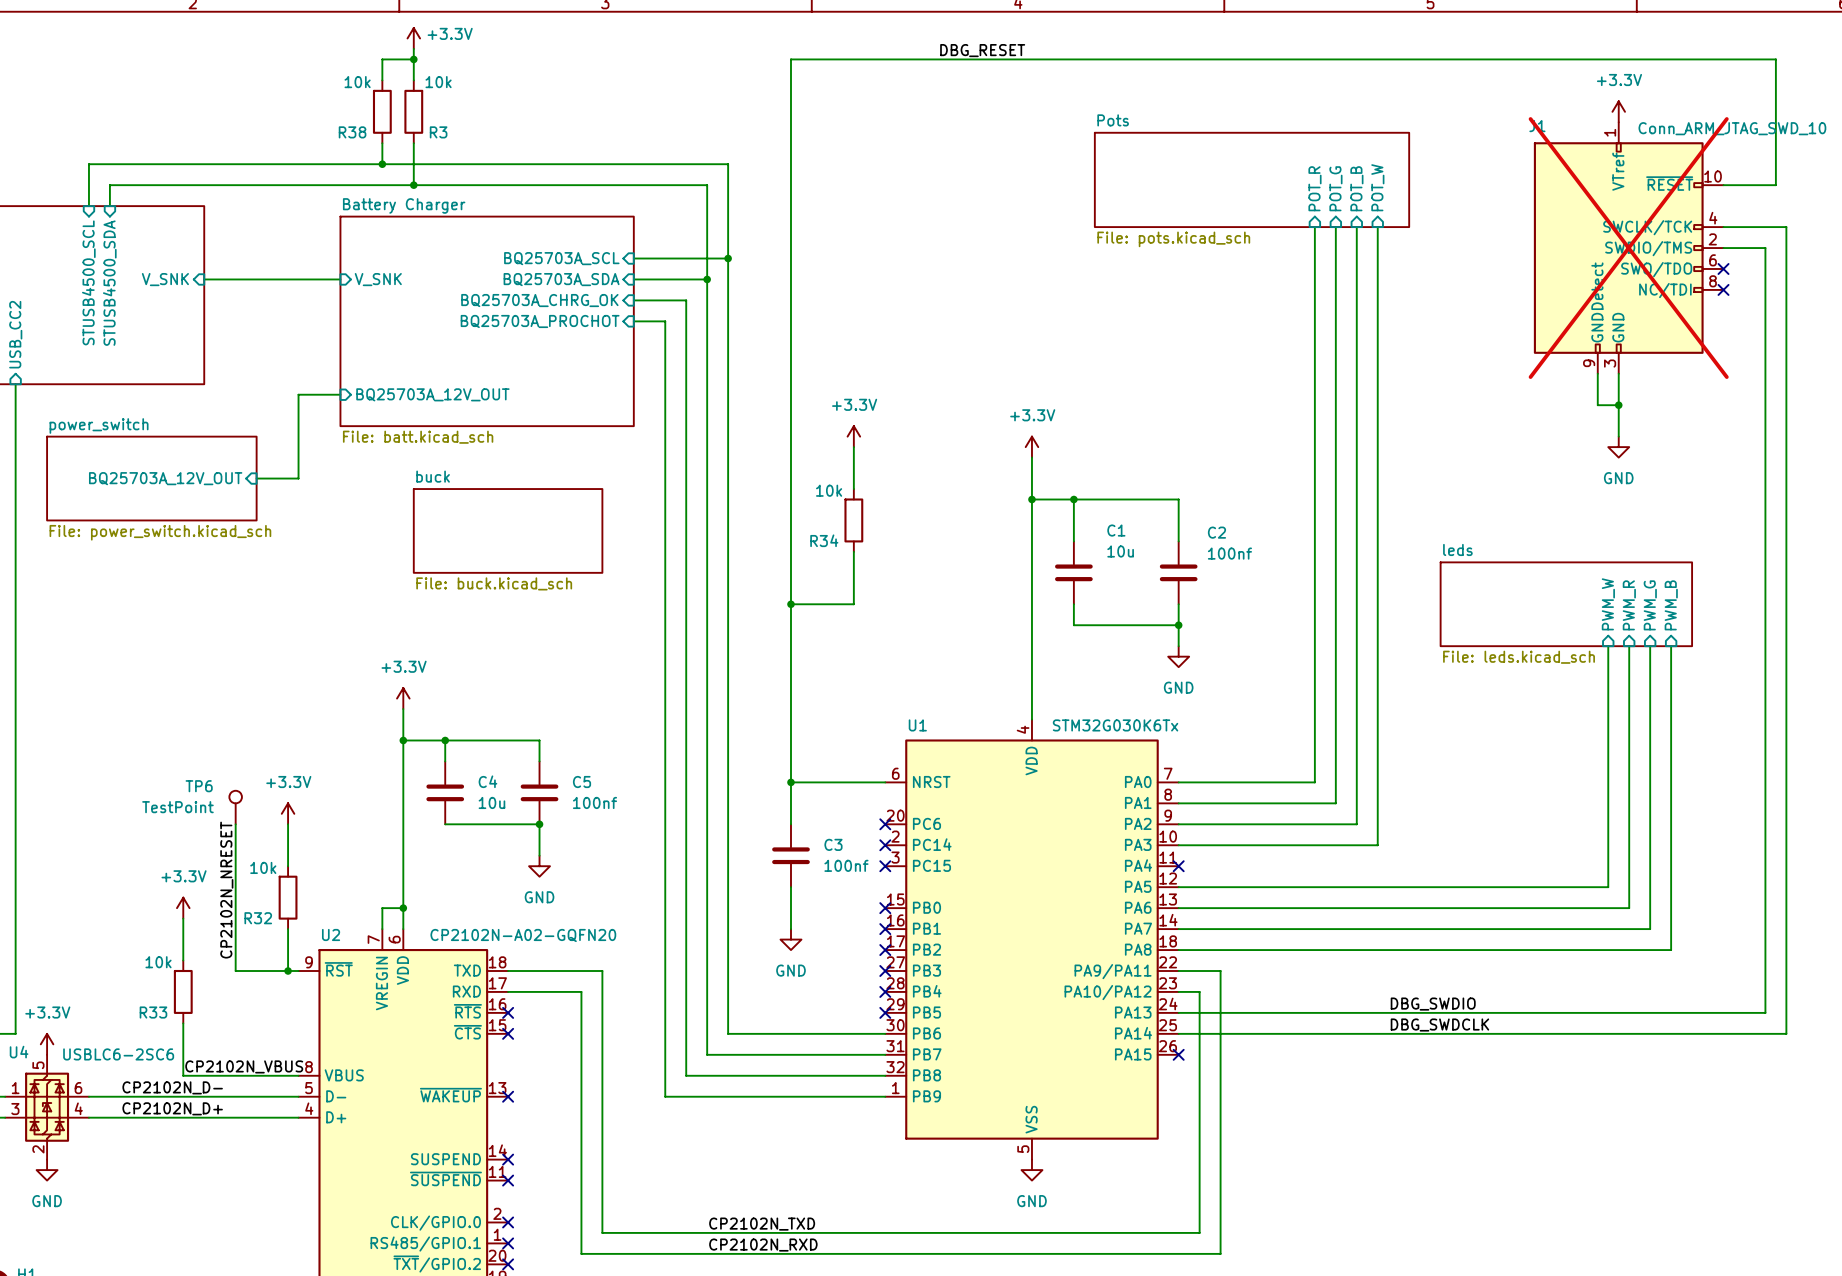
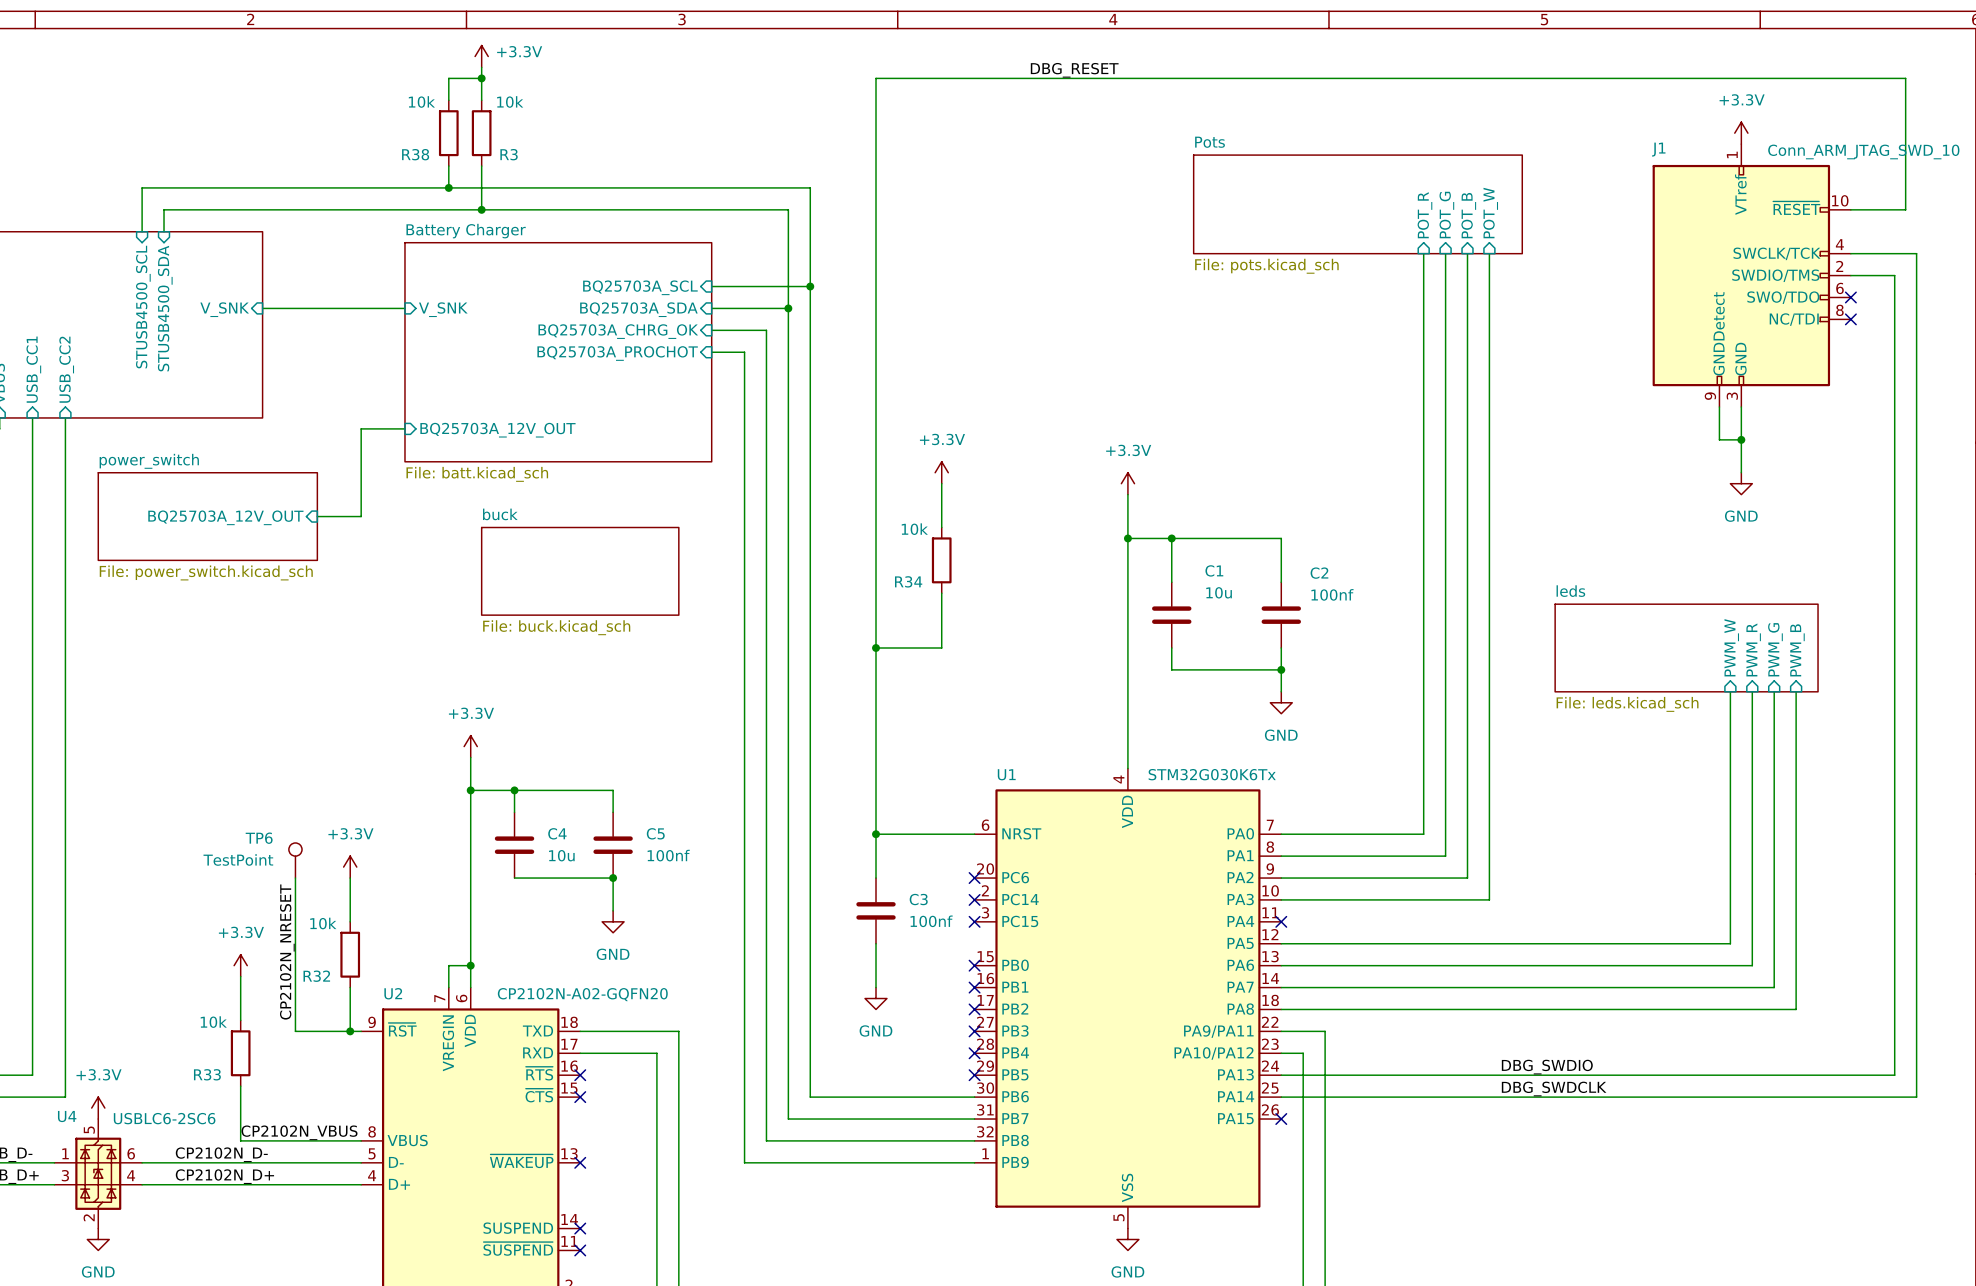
J1 do-not-place cross: (1628, 248) -> none

